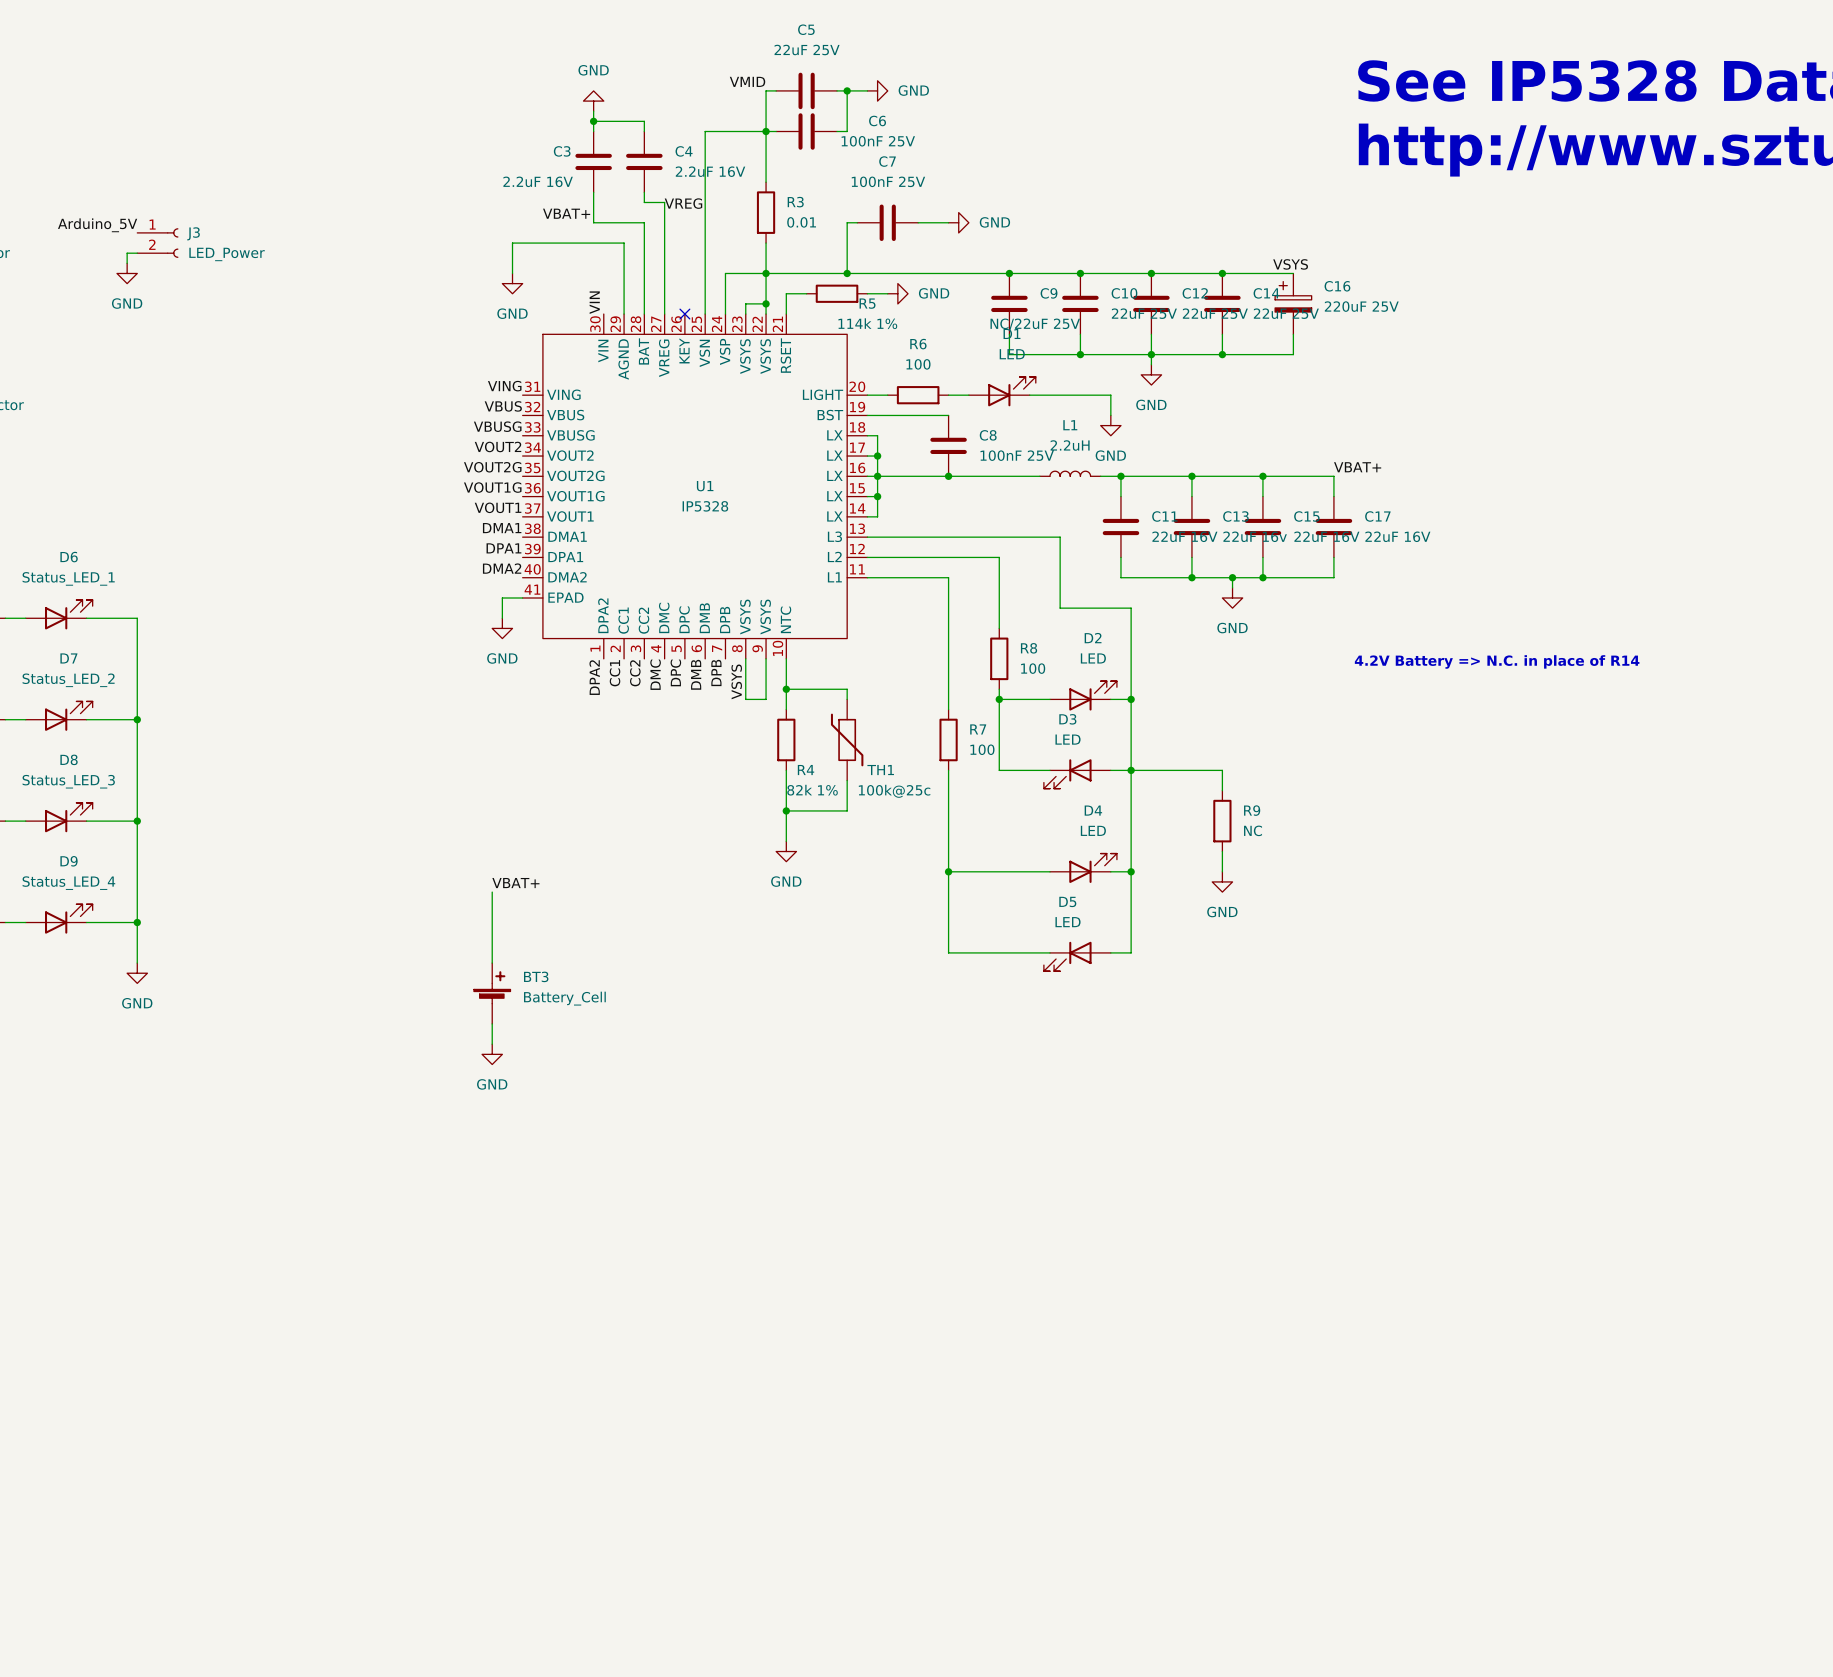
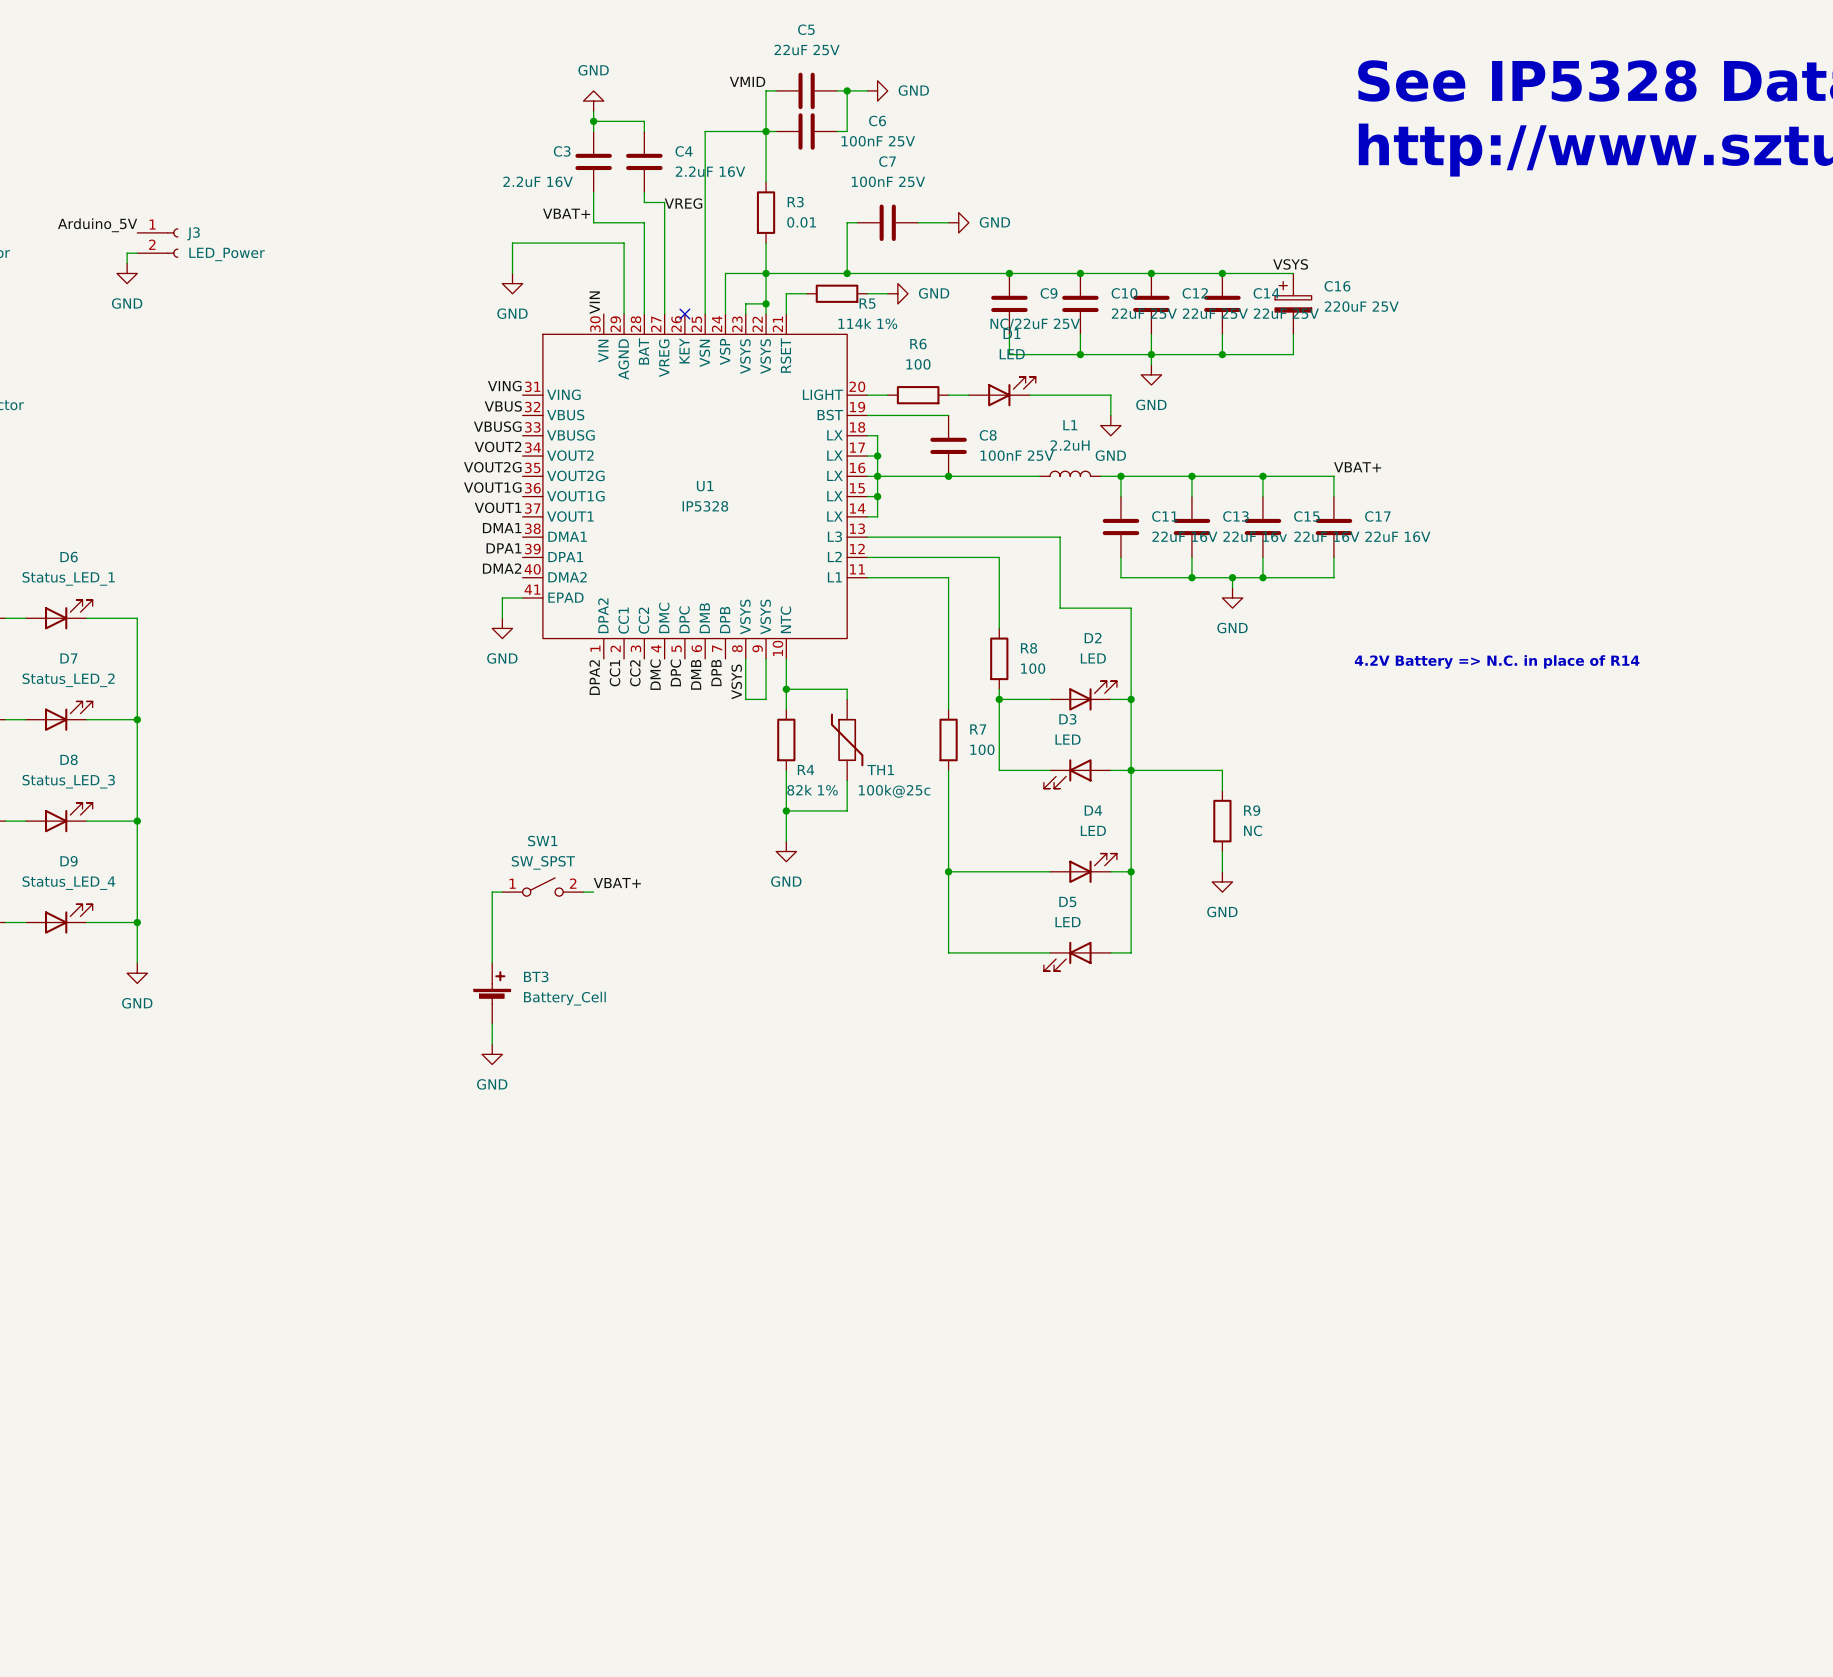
label position: VBAT+ (515, 883) -> VBAT+ (617, 883)
SW1: none -> SW_SPST (542, 887)
wire: none -> (492, 892) (502, 892)
wire: none -> (583, 892) (593, 892)

